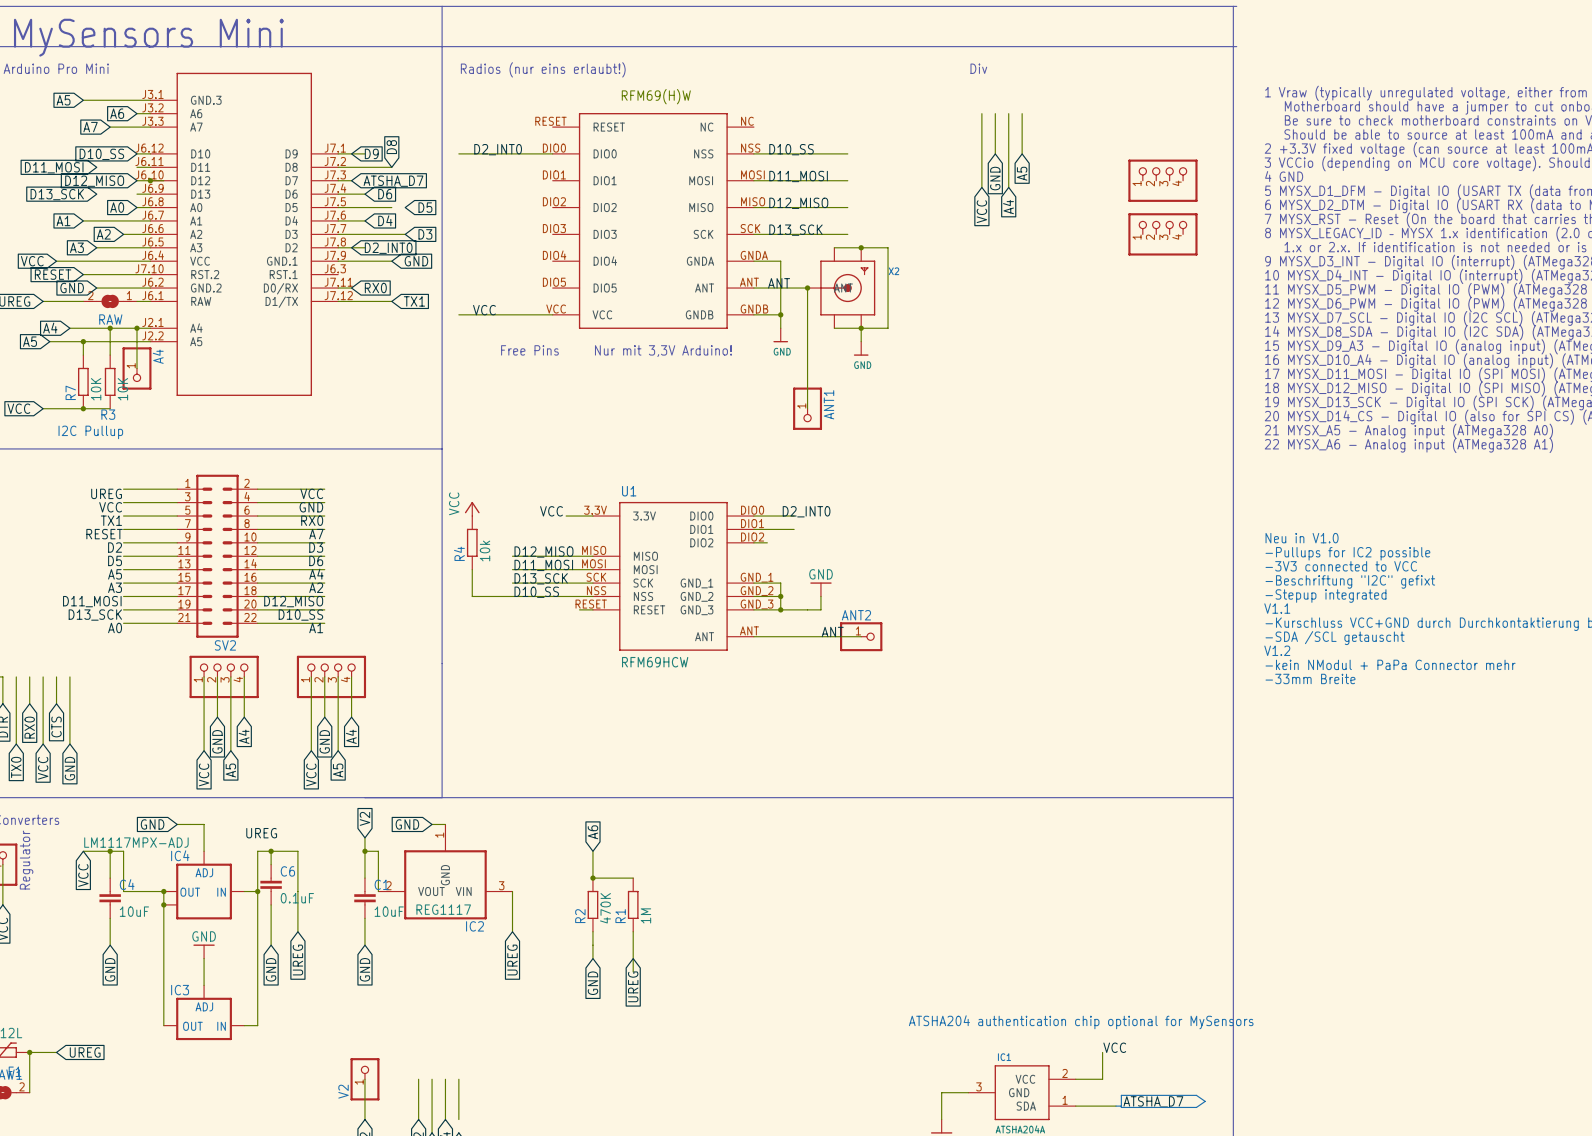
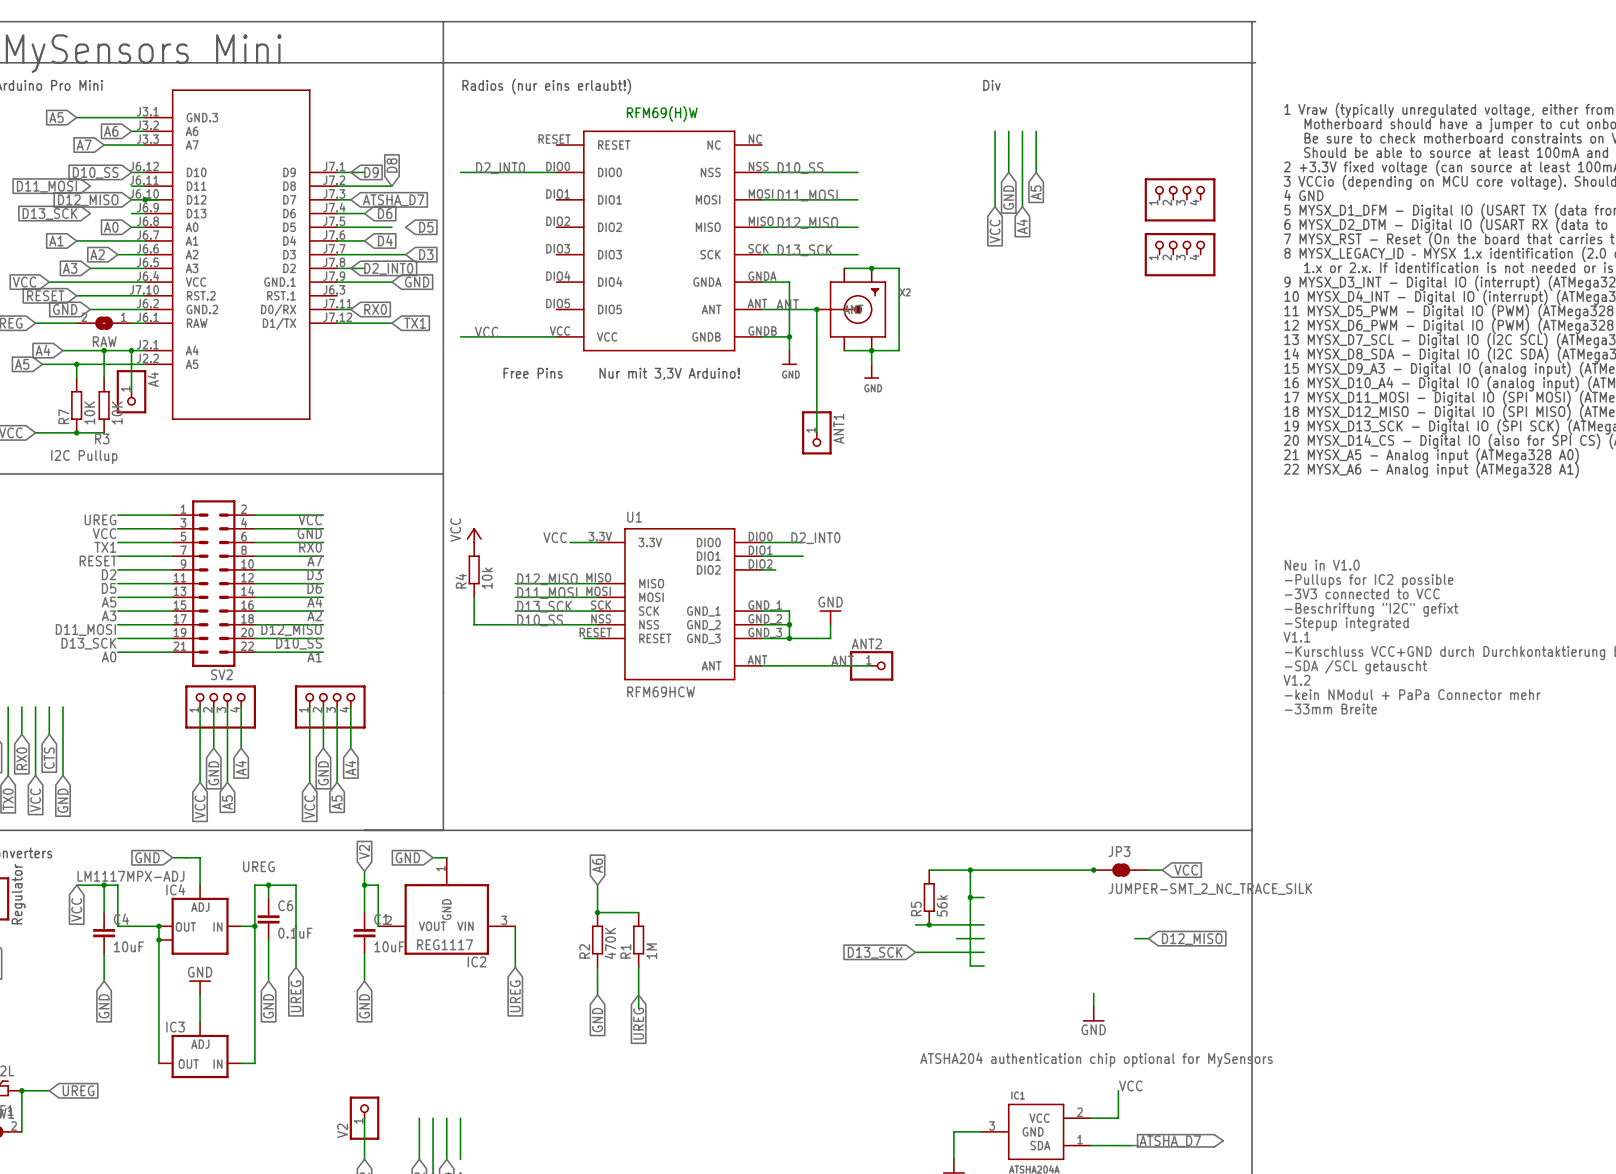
wire: none -> (929, 870) (1093, 870)
wire: none -> (970, 870) (970, 966) (984, 966)
junction: none -> (970, 870)
junction: none -> (1093, 870)
JP3: none -> JUMPER-SMT_2_NC_TRACE_SILK (1121, 870)
wire: none -> (1148, 870) (1162, 870)
global label: none -> VCC (1186, 870)
R5: none -> 56k (929, 897)
wire: none -> (970, 897) (984, 897)
junction: none -> (970, 897)
wire: none -> (915, 924) (984, 924)
junction: none -> (929, 924)
wire: none -> (956, 938) (984, 938)
wire: none -> (1134, 938) (1148, 938)
global label: none -> D12_MISO (1192, 939)
global label: none -> D13_SCK (875, 952)
wire: none -> (915, 952) (984, 952)
wire: none -> (1093, 993) (1093, 1007)
power symbol: none -> GND (1093, 1014)

